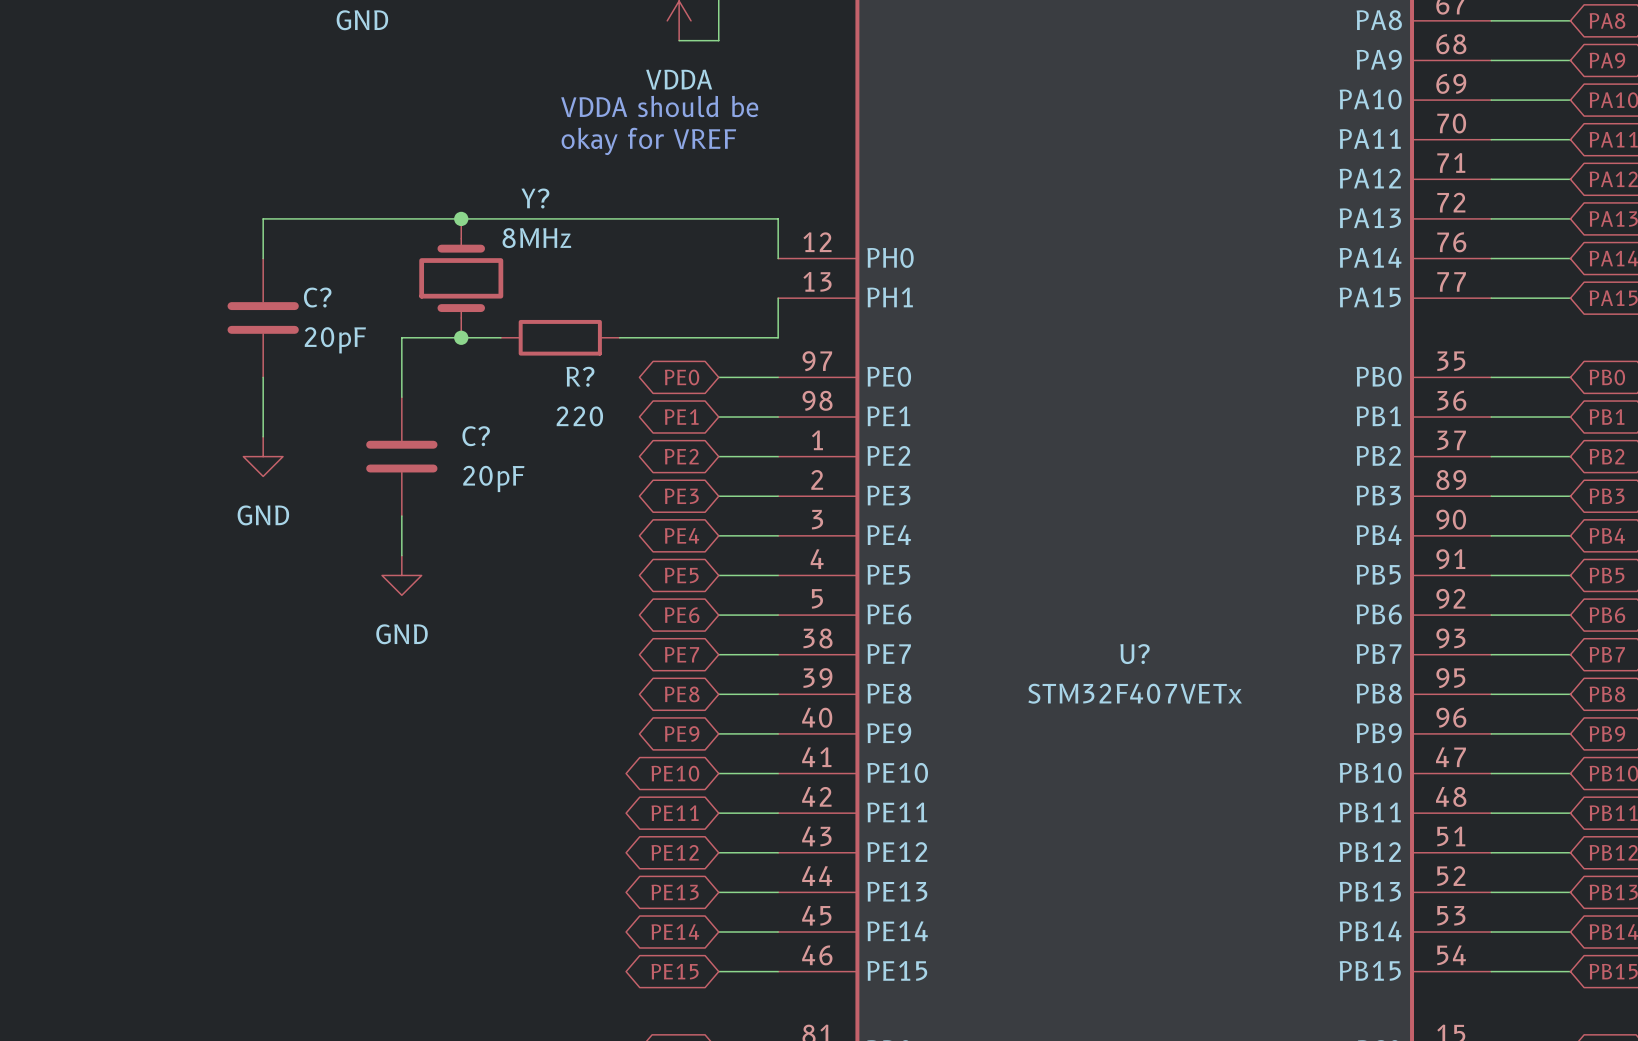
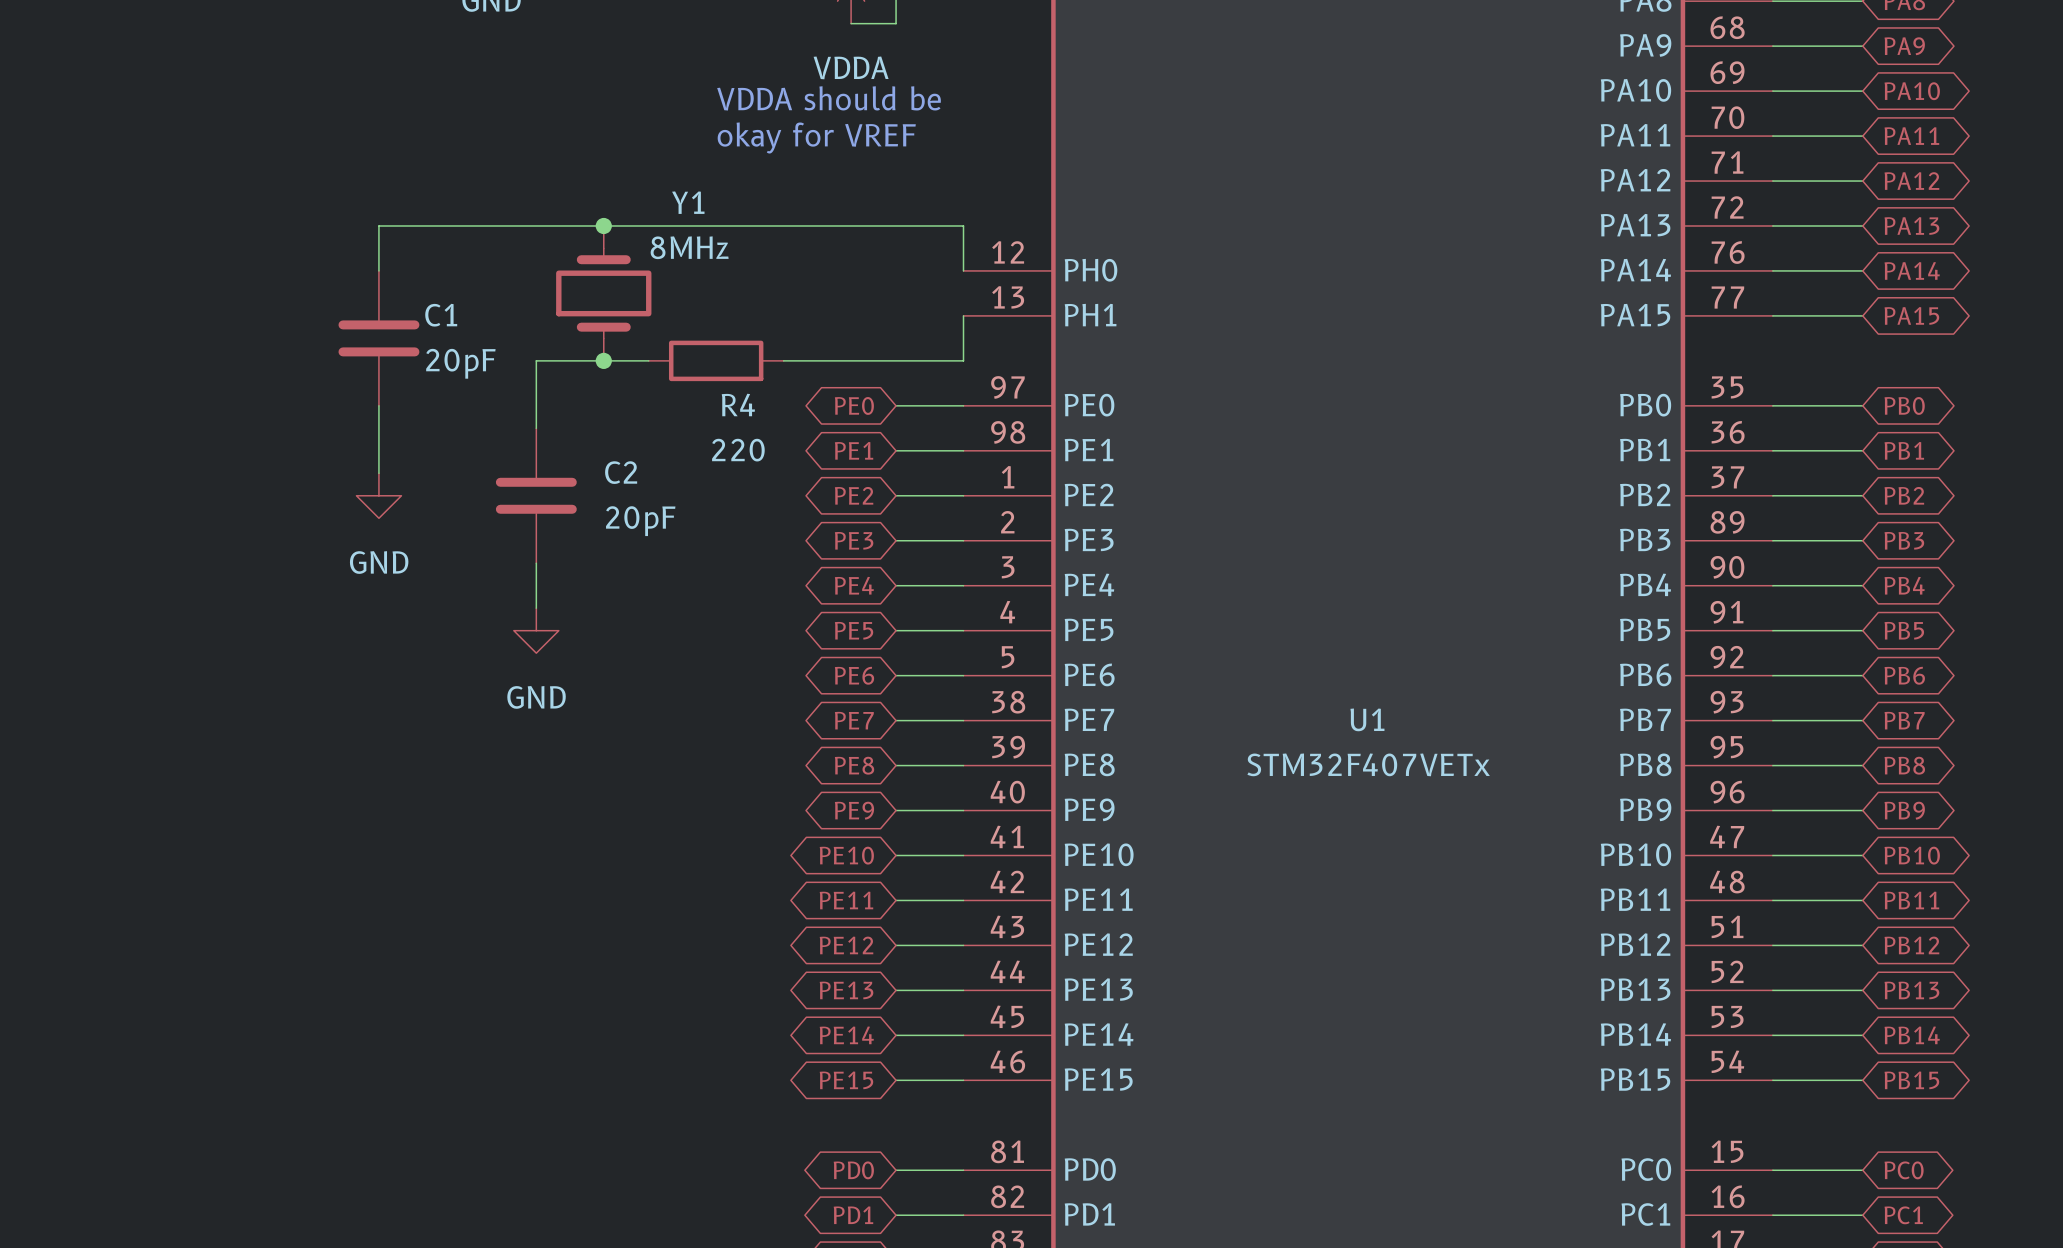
Y? name: Y? (535, 198) -> Y1 (688, 202)
C? name: C? (317, 297) -> C1 (441, 315)
R? name: R? (580, 376) -> R4 (738, 405)
C? name: C? (476, 436) -> C2 (621, 472)
U? name: U? (1135, 654) -> U1 (1367, 719)

